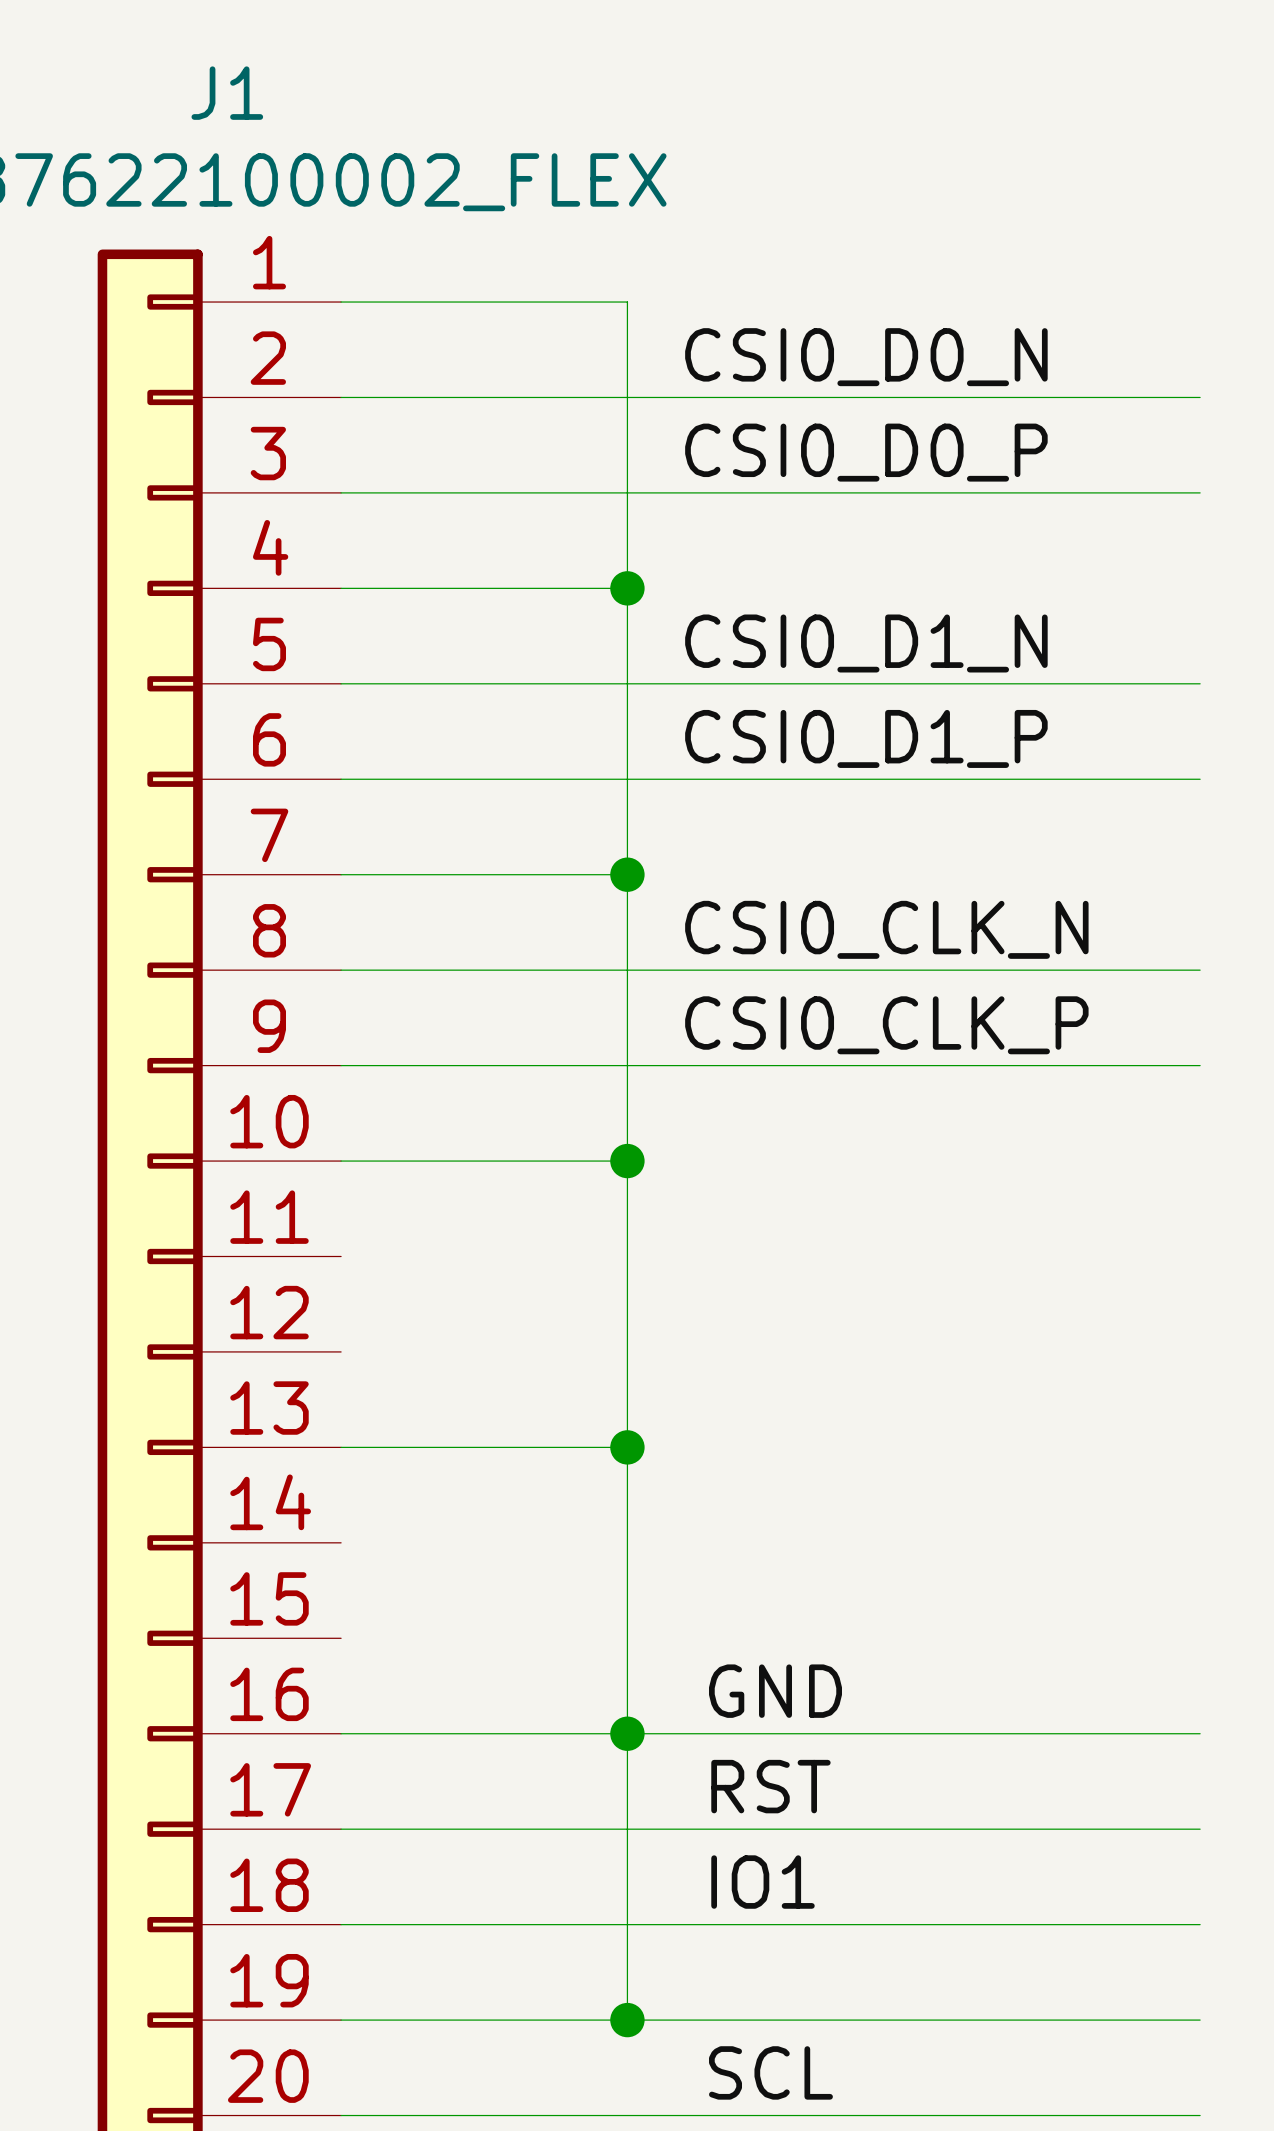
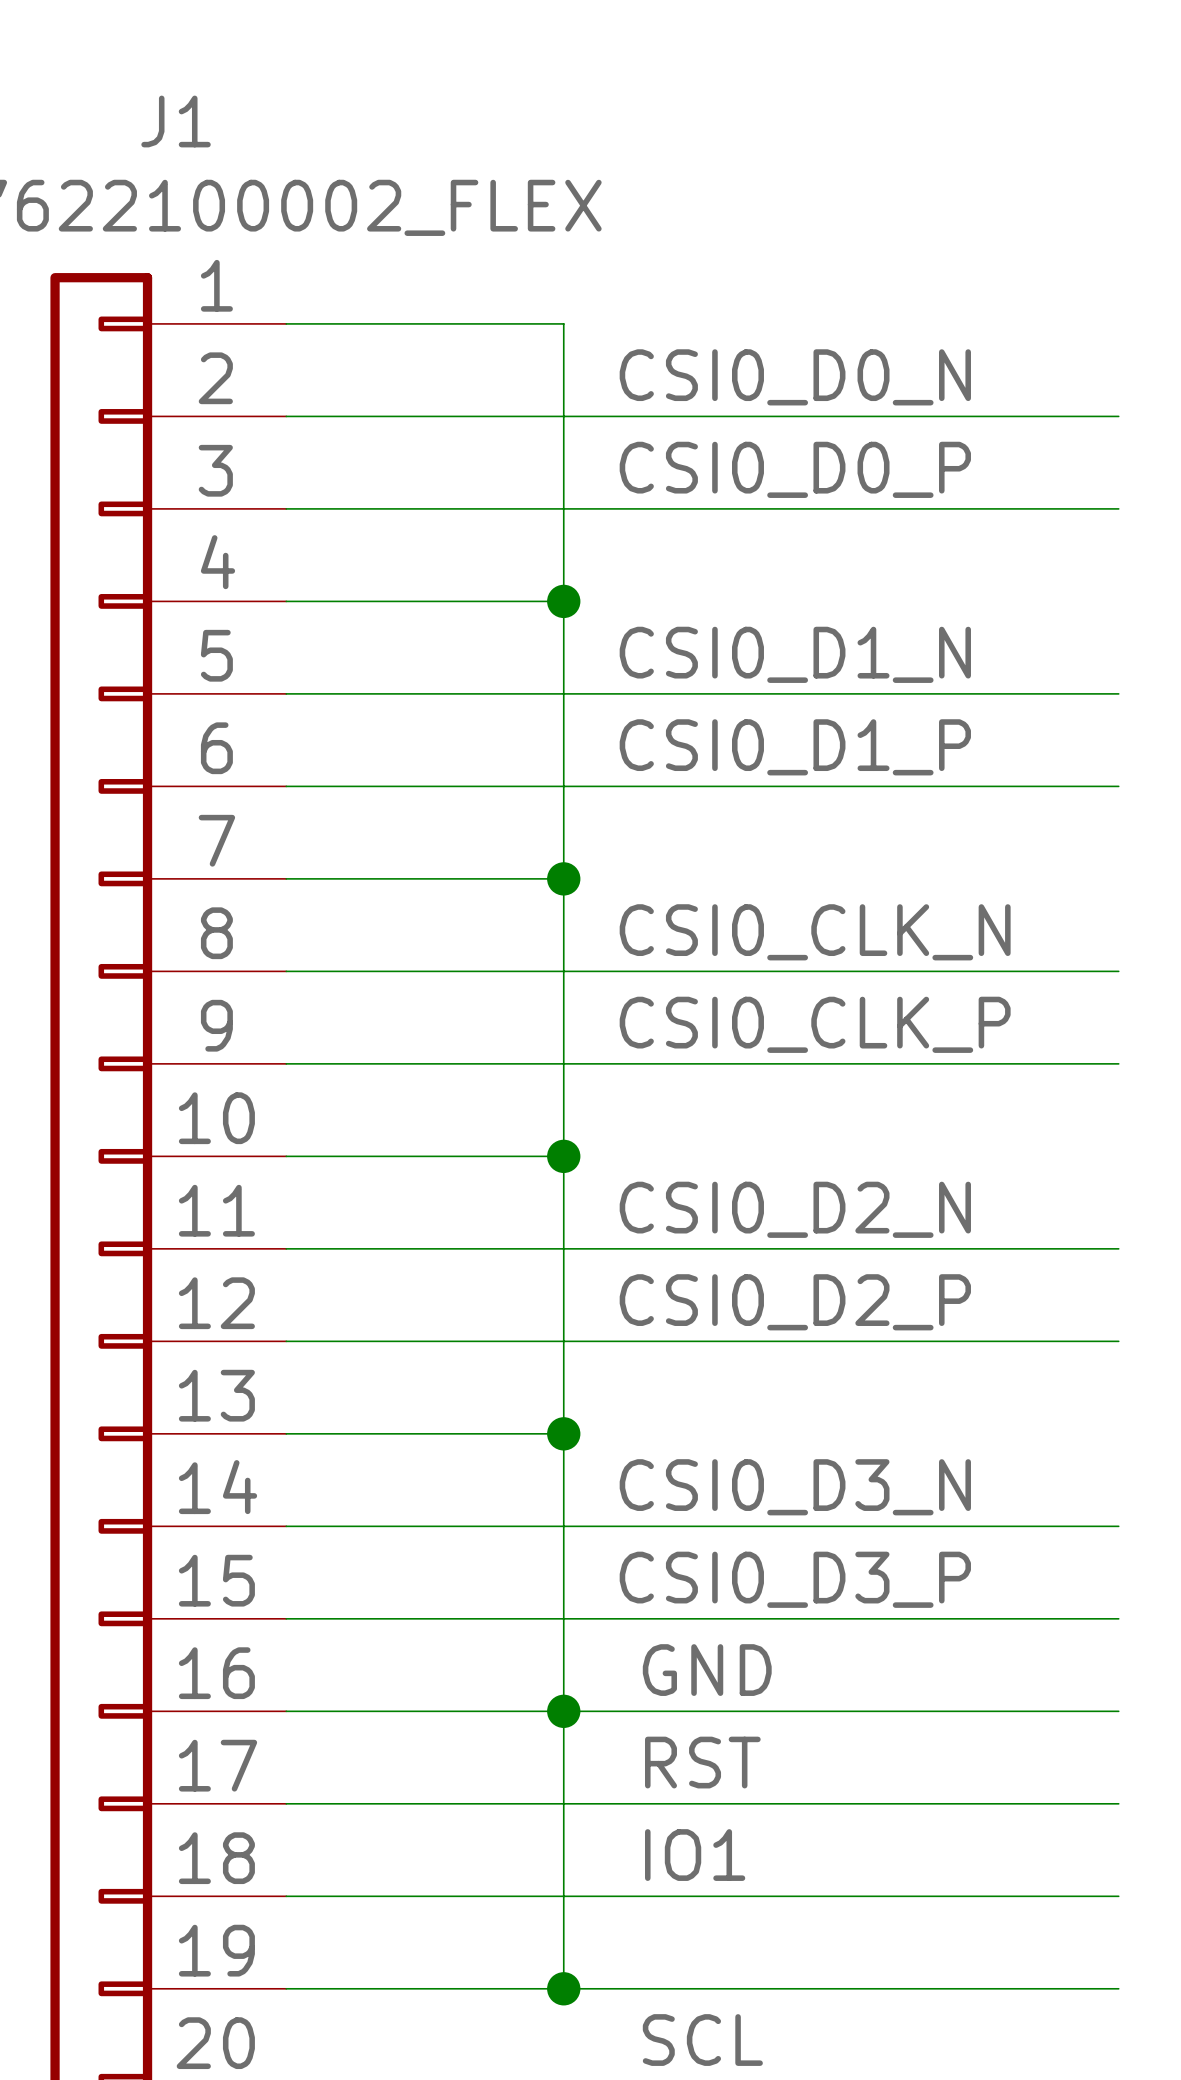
label: none -> CSI0_D2_N (795, 1209)
wire: none -> (286, 1248) (1118, 1248)
label: none -> CSI0_D2_P (795, 1302)
wire: none -> (286, 1341) (1118, 1341)
label: none -> CSI0_D3_N (795, 1487)
wire: none -> (286, 1526) (1118, 1526)
label: none -> CSI0_D3_P (795, 1579)
wire: none -> (286, 1618) (1118, 1618)

